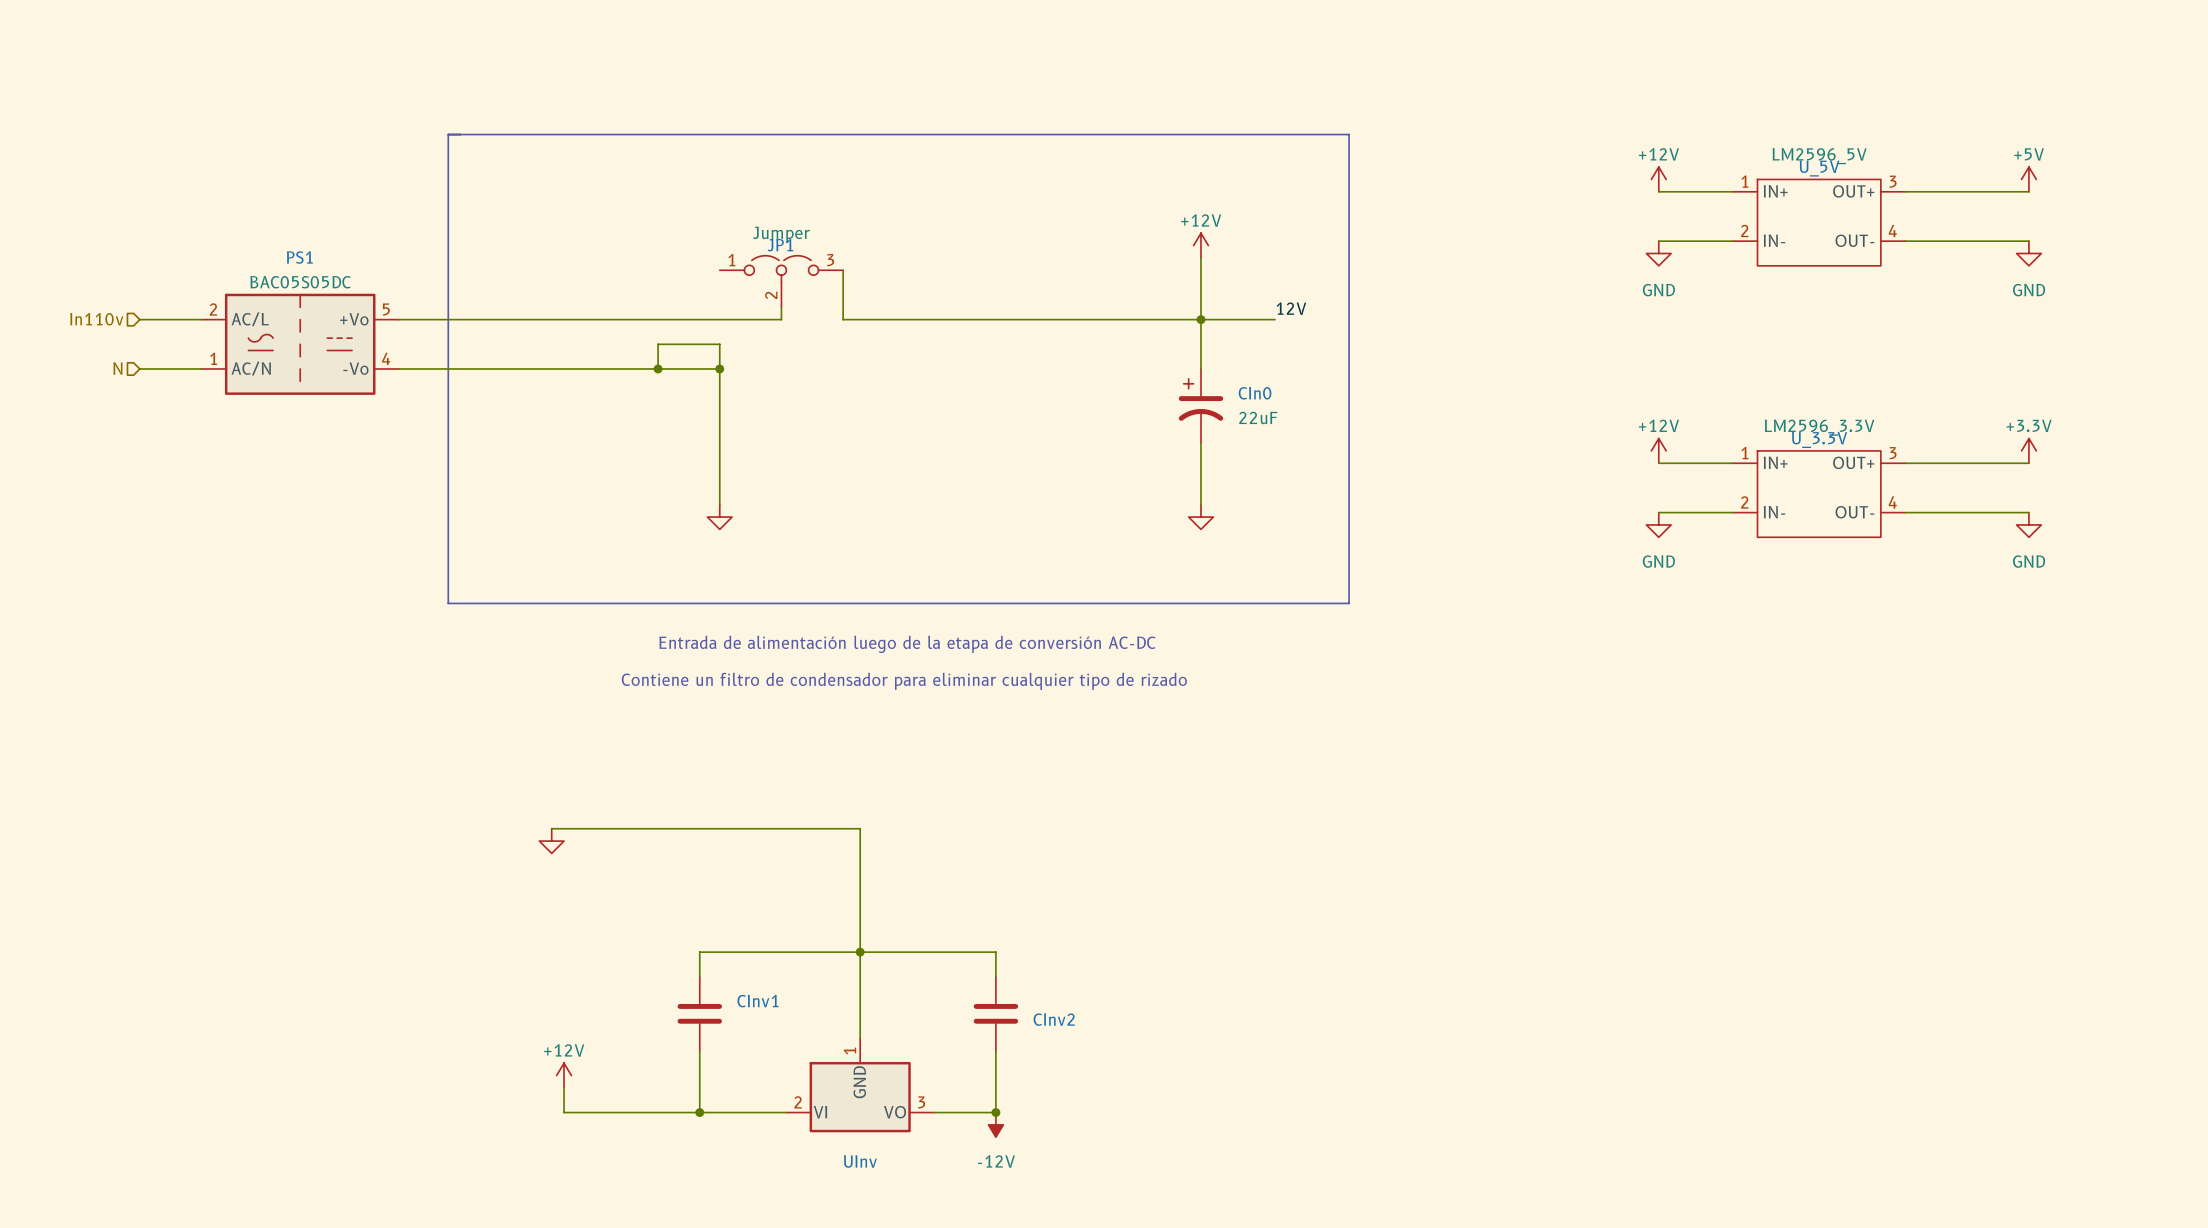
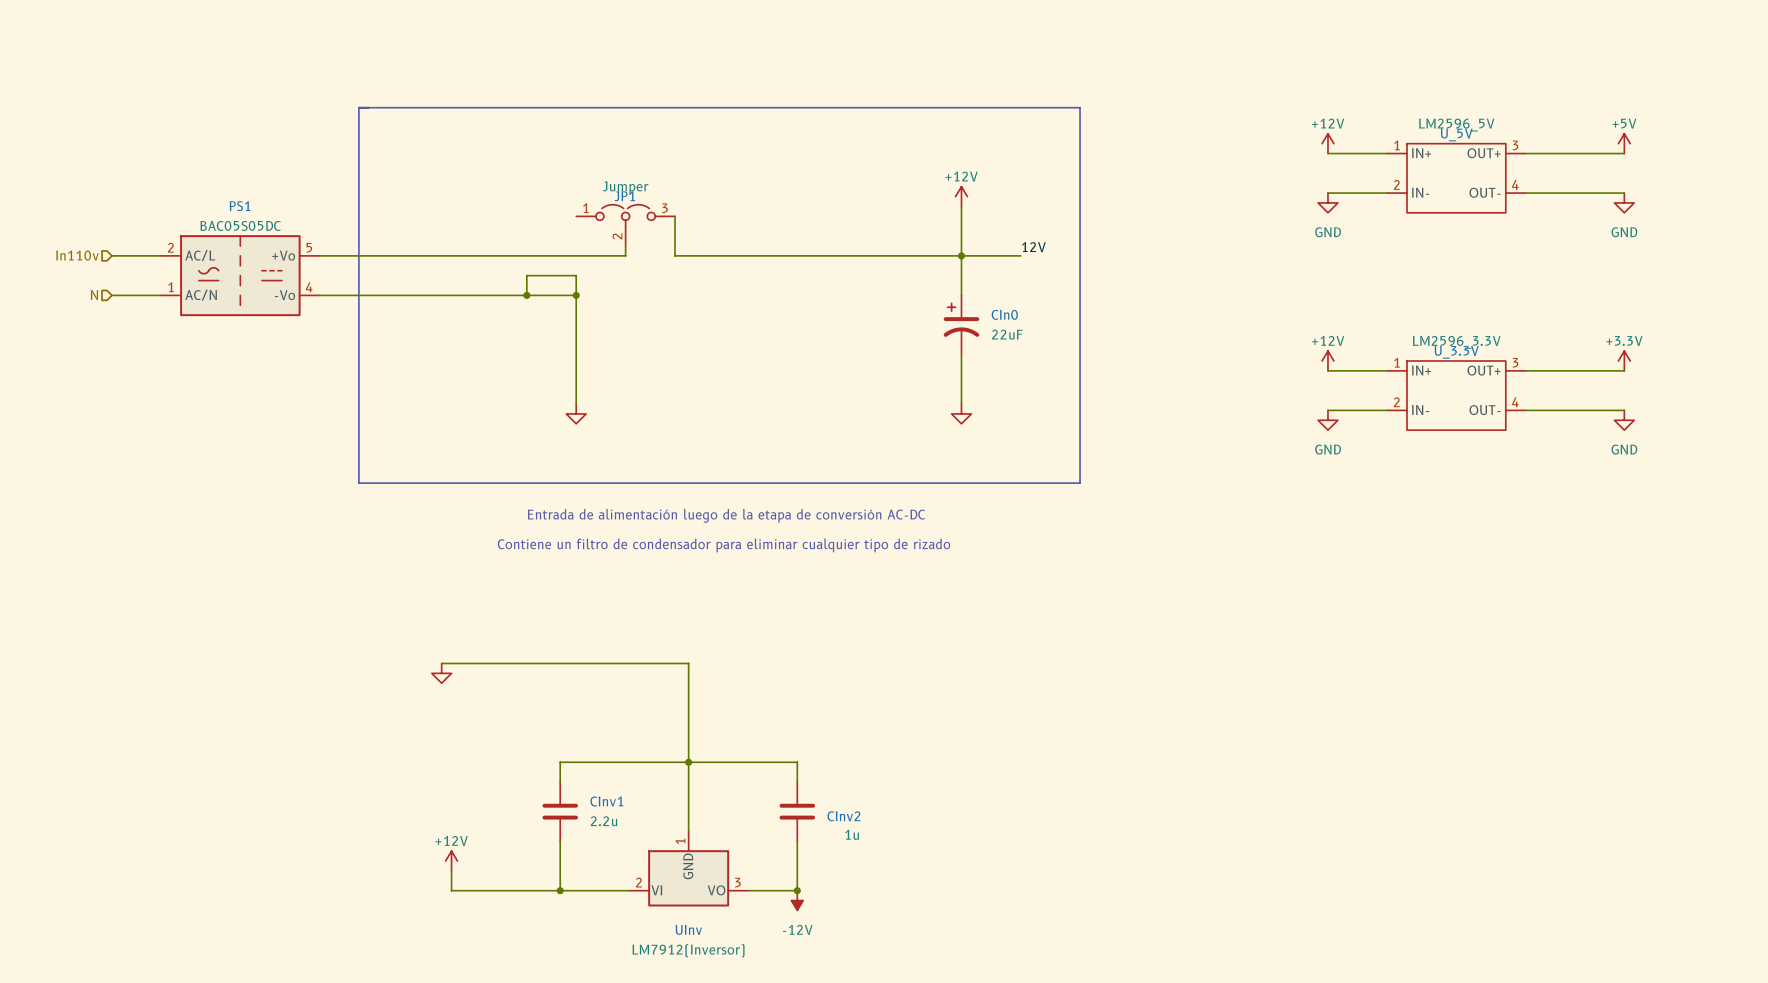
CInv1 value: none -> 2.2u (603, 821)
CInv2 value: none -> 1u (852, 834)
UInv value: none -> LM7912(Inversor) (688, 950)

